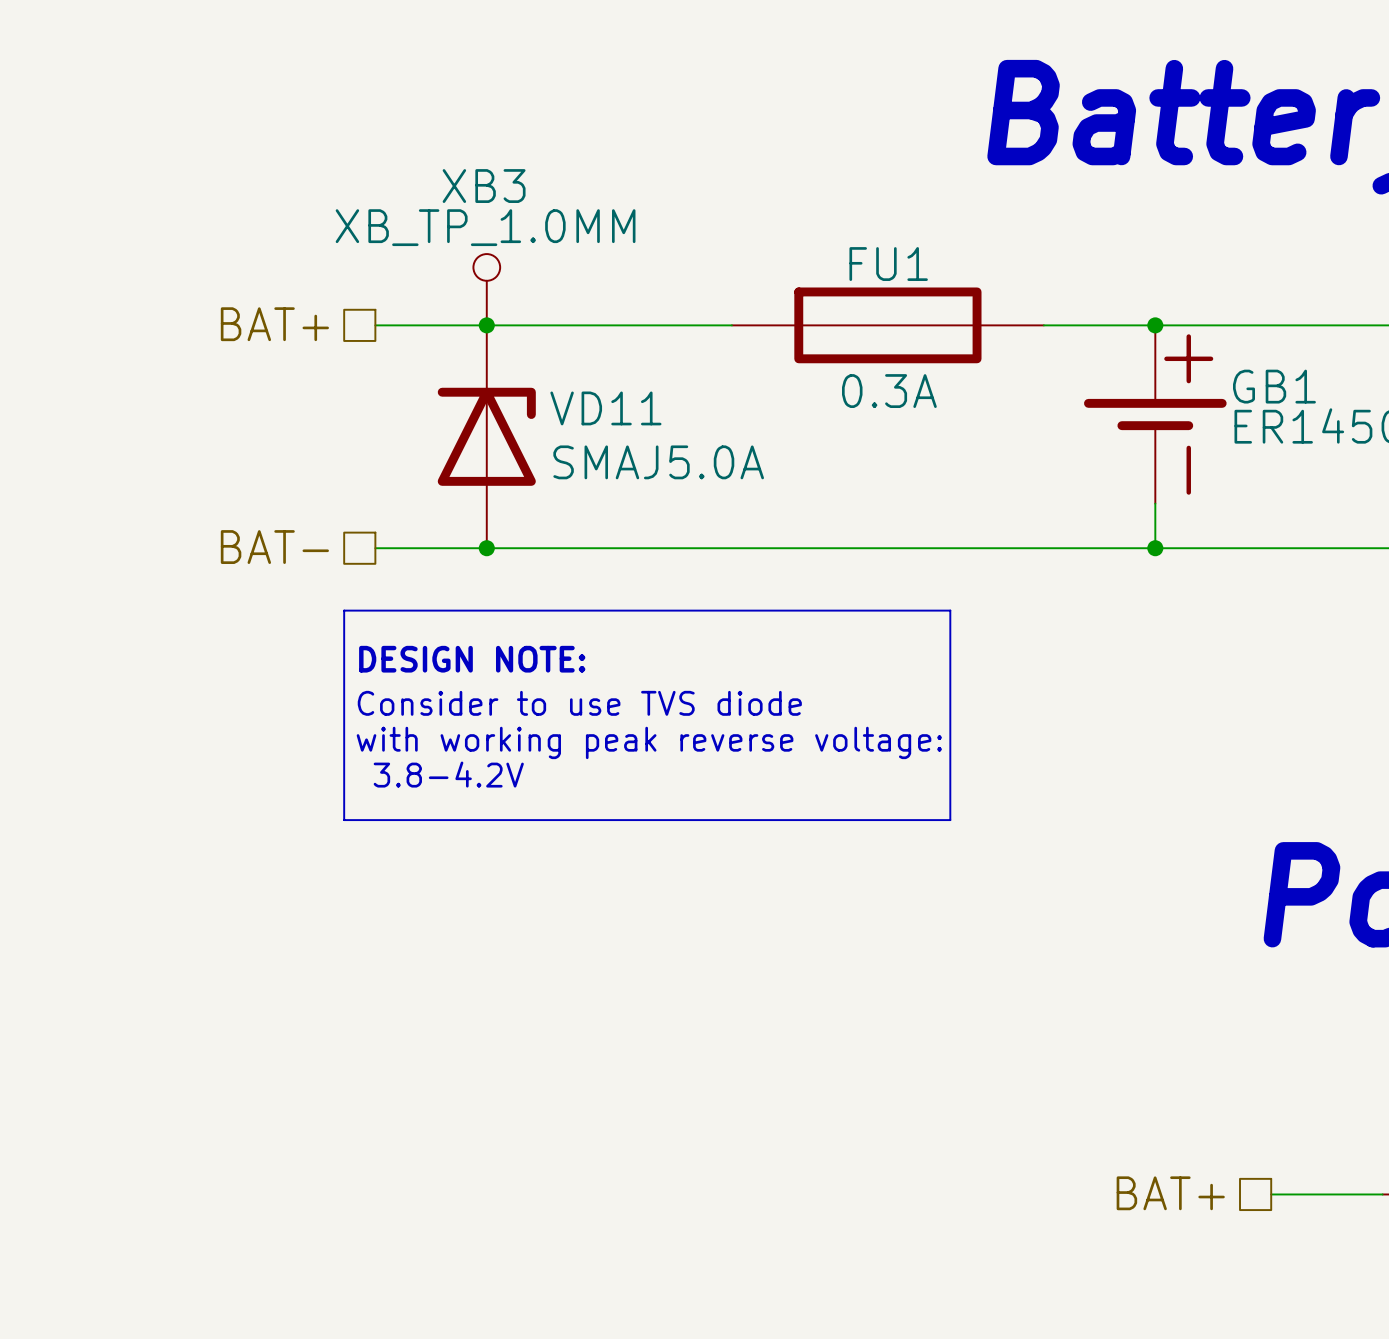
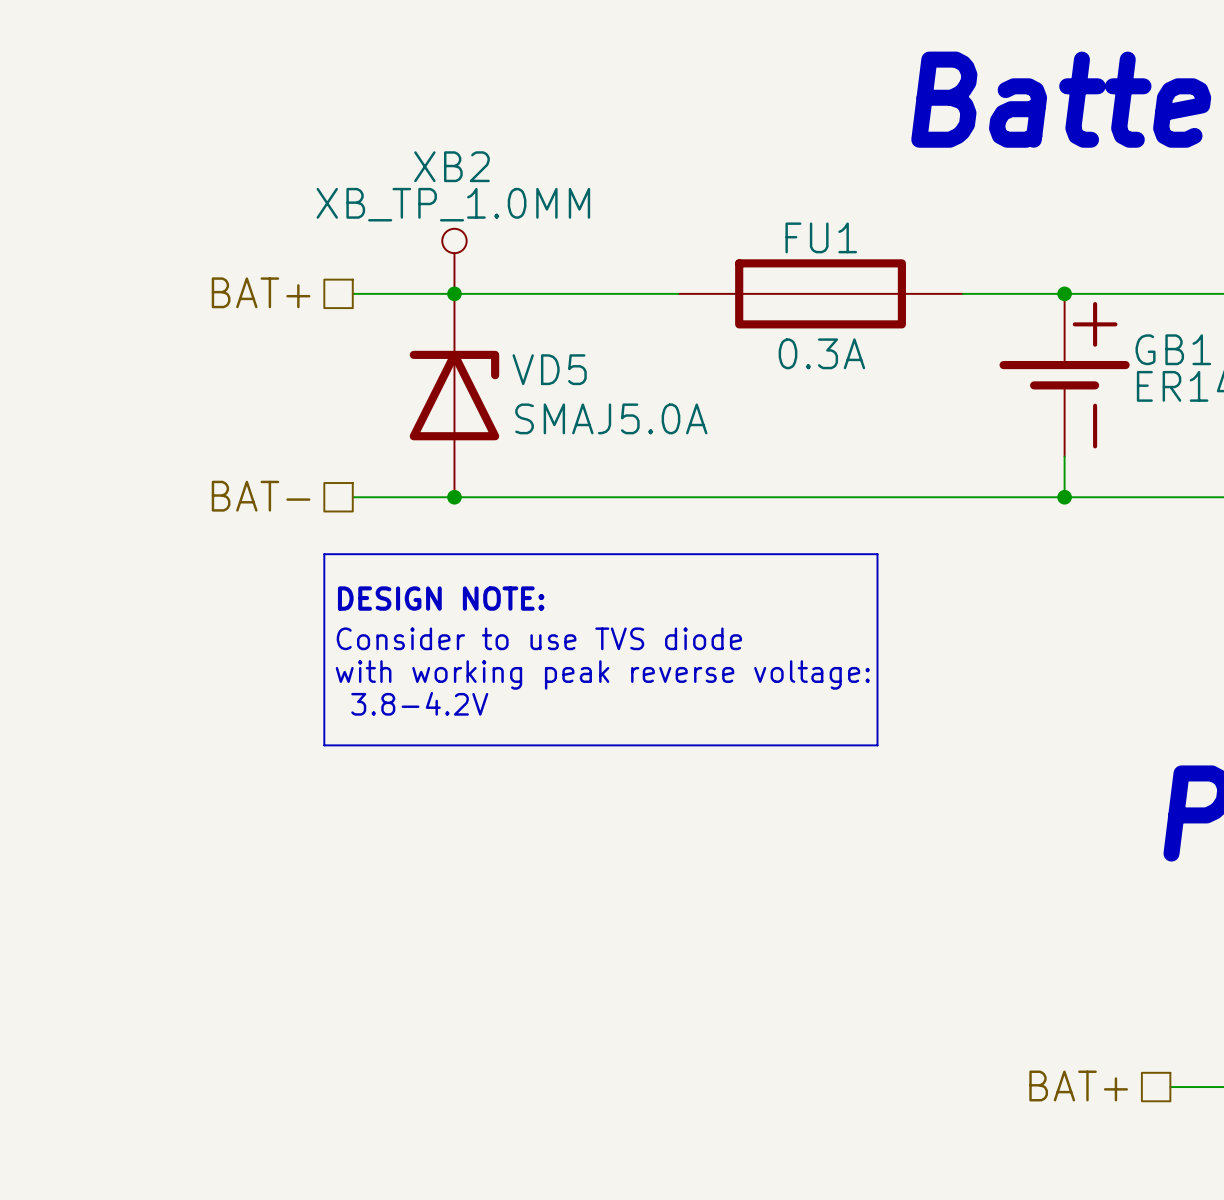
XB3 name: XB3 (484, 186) -> XB2 (452, 166)
VD11 name: VD11 (605, 408) -> VD5 (549, 369)

